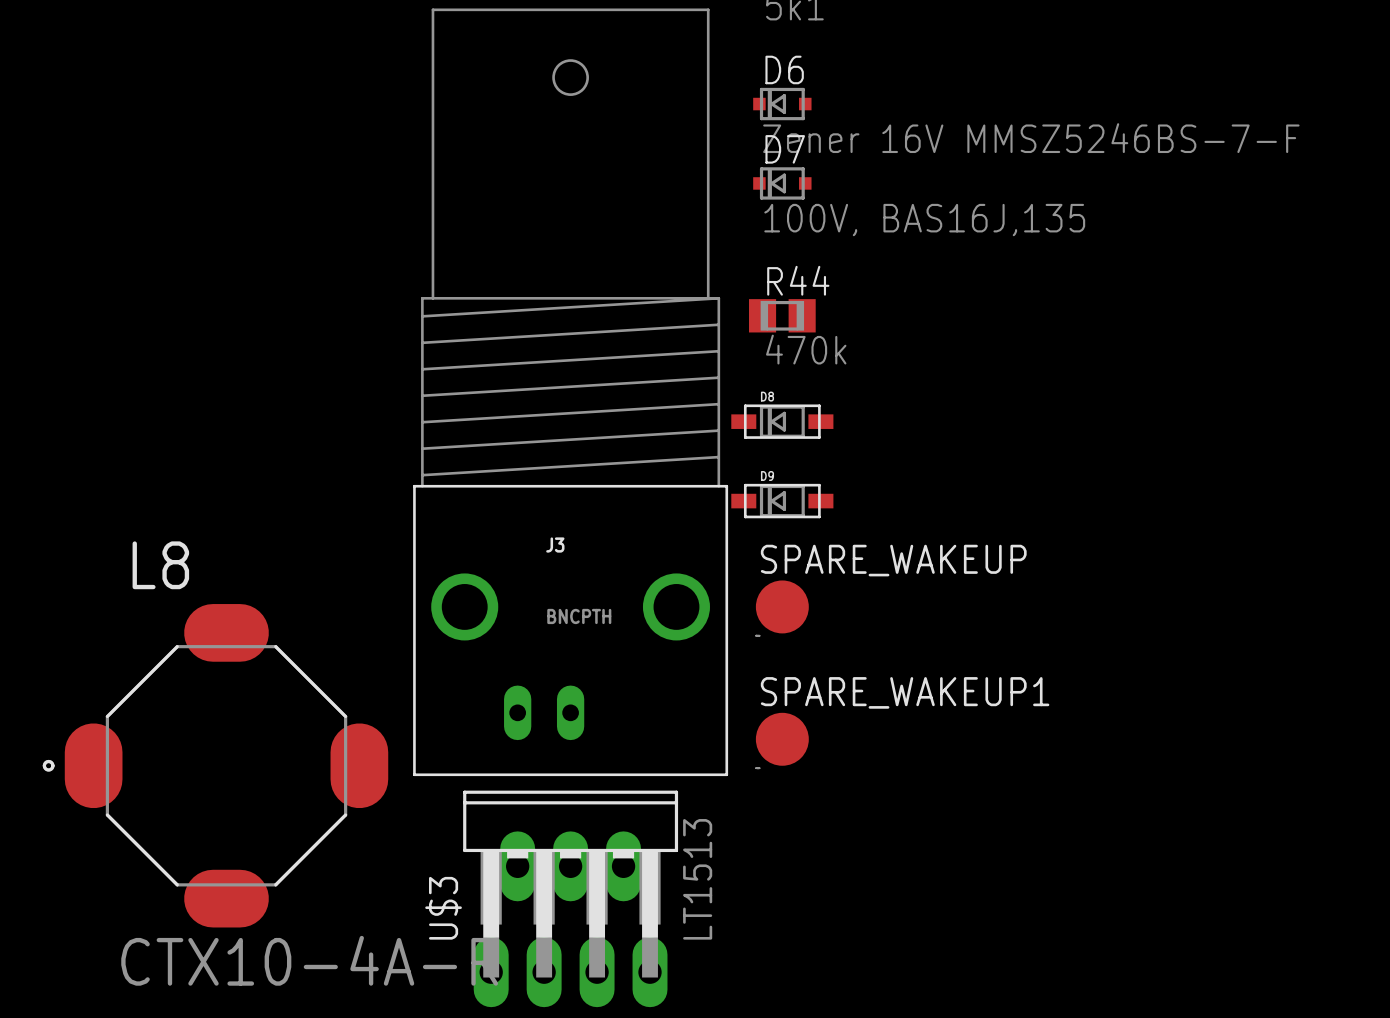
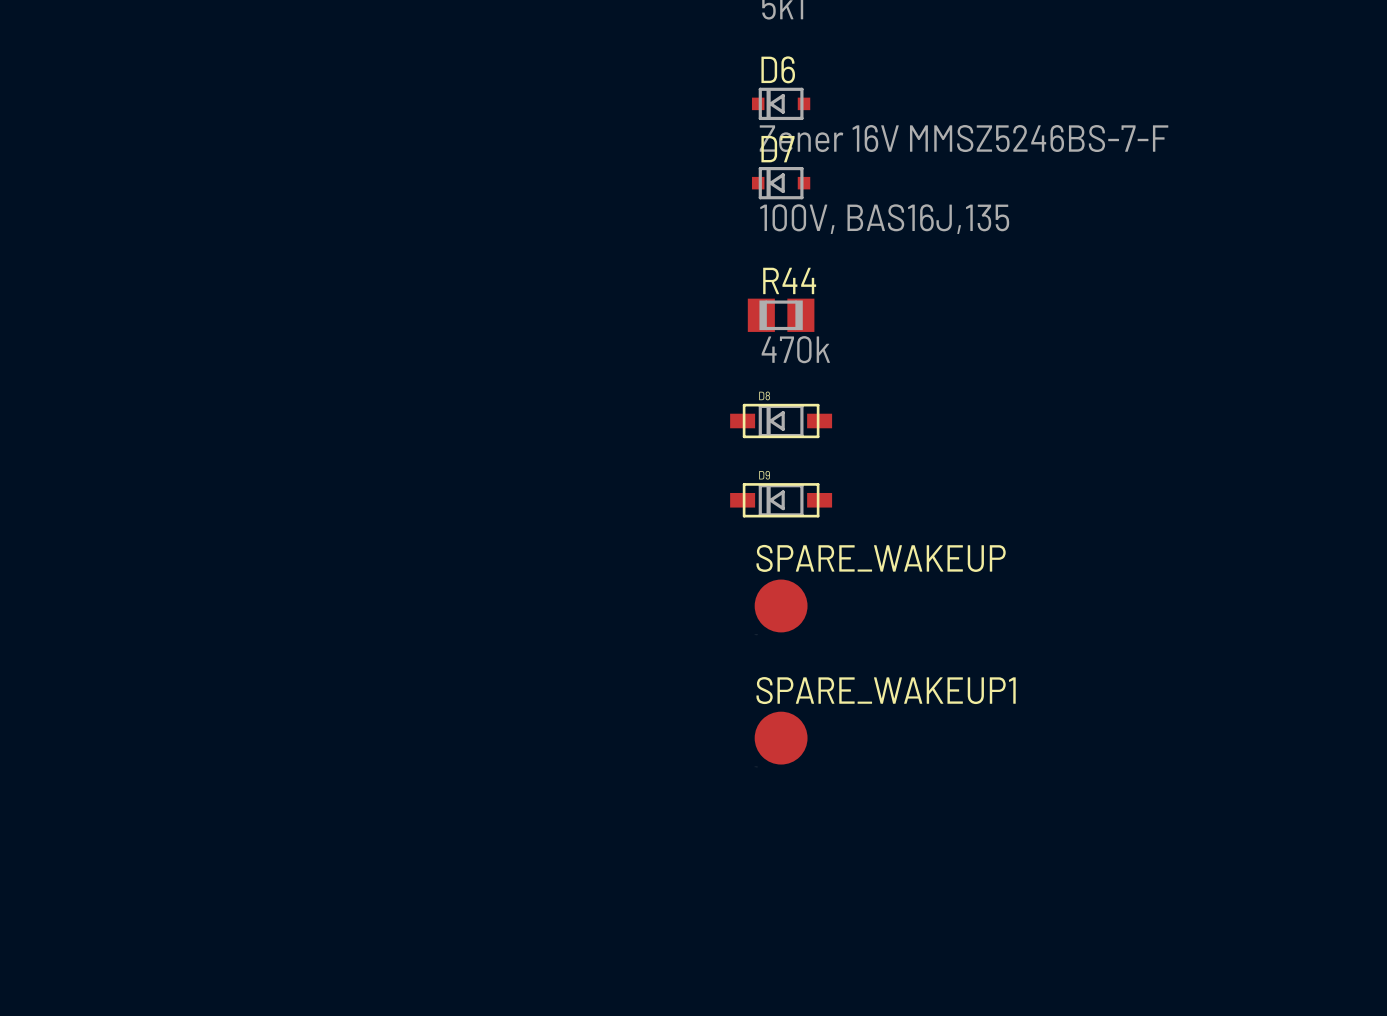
J3: BNCPTH (570, 392) -> none
L8: CTX10-4A-R (215, 765) -> none
U$3: LT1513 (570, 898) -> none

